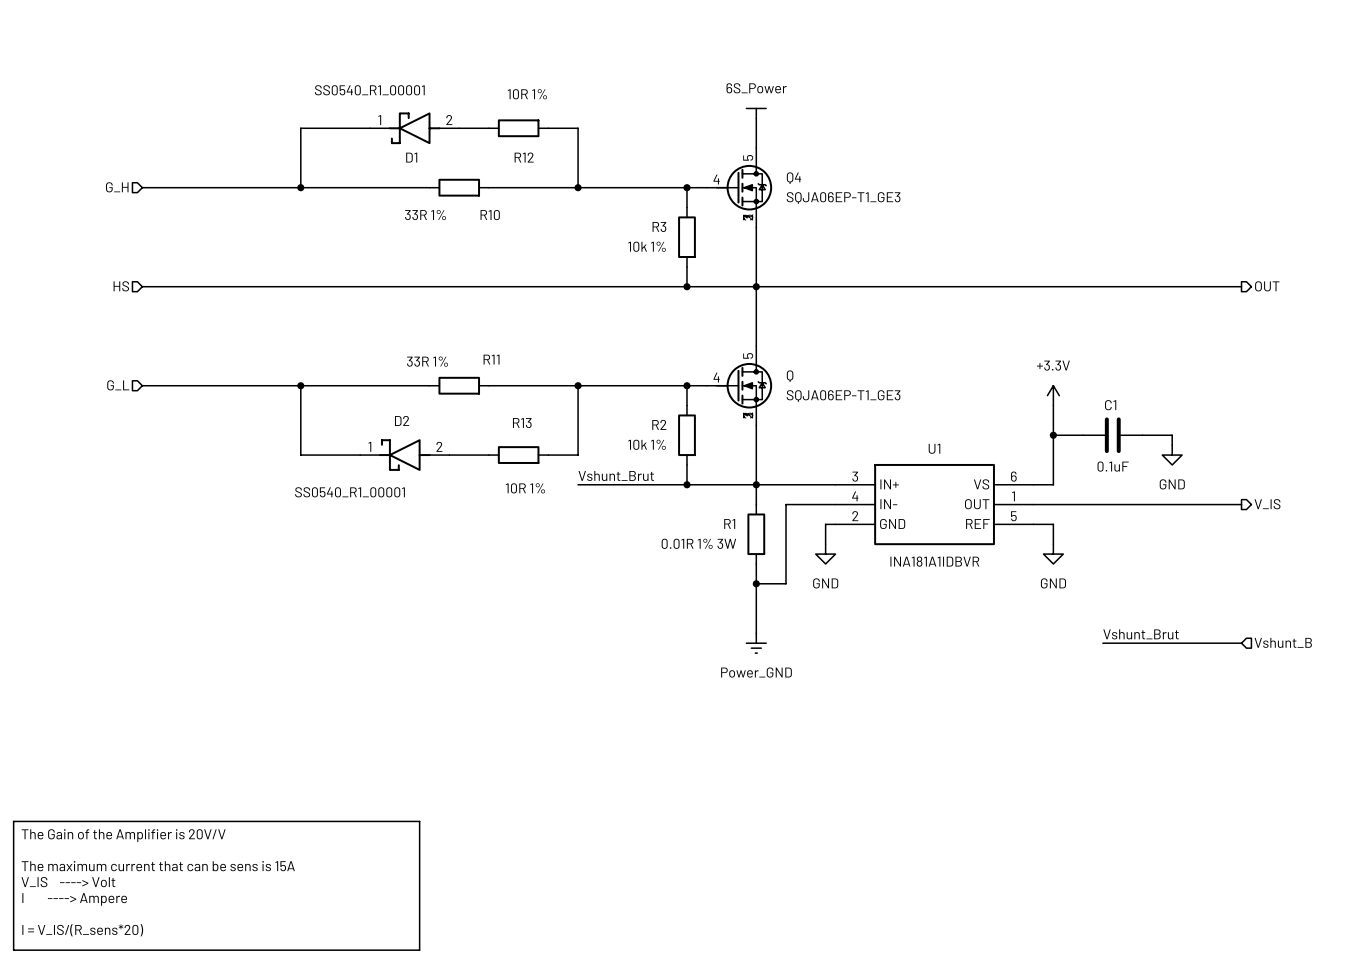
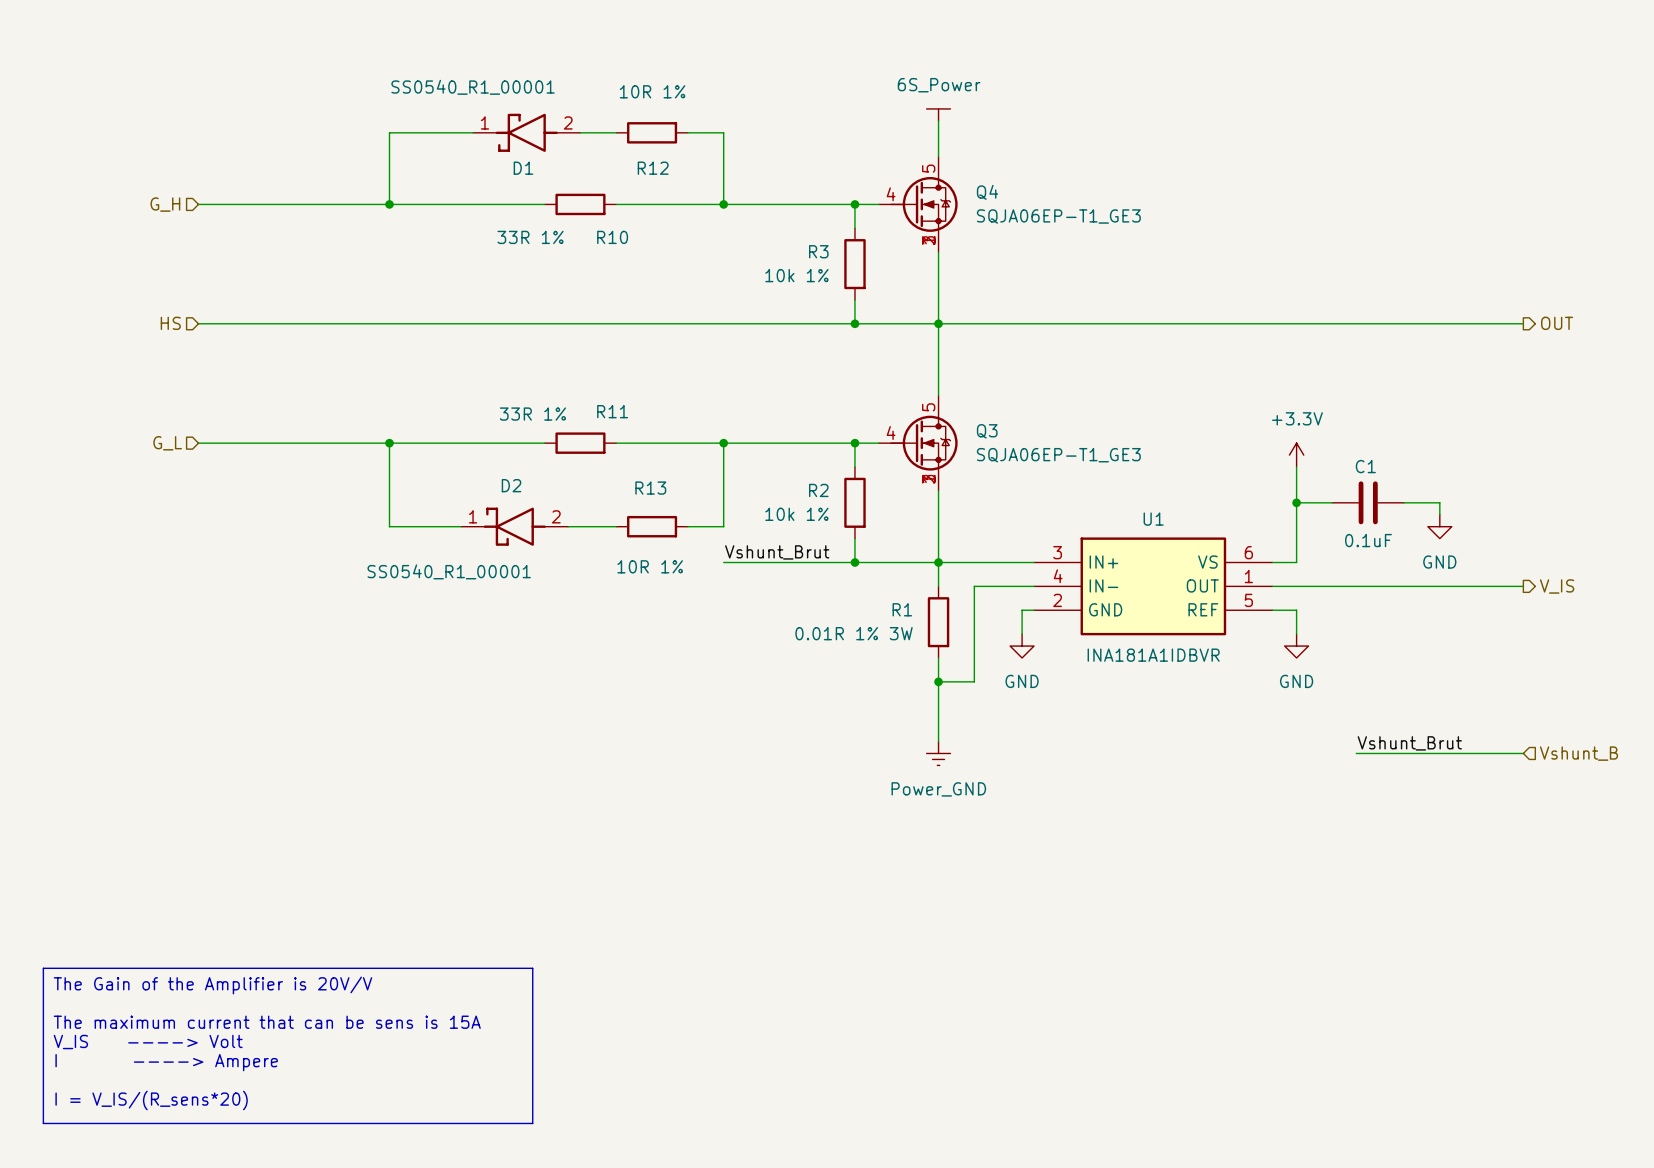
Q name: Q (790, 376) -> Q3 (987, 431)

